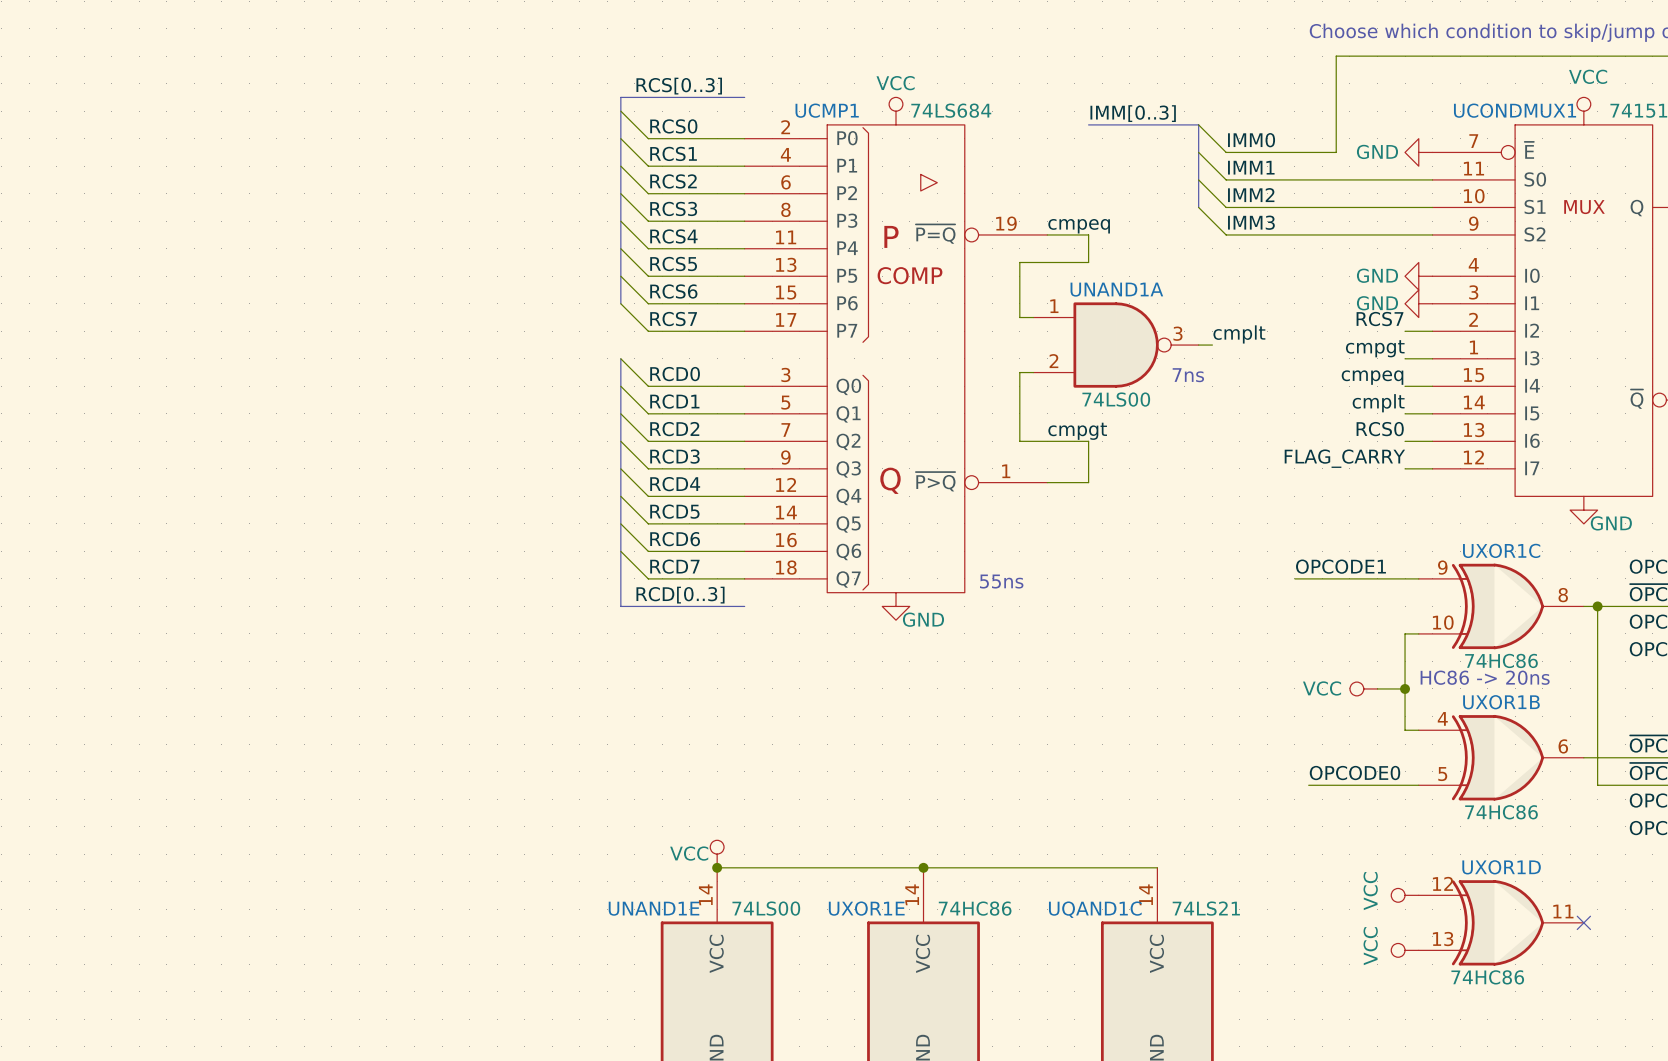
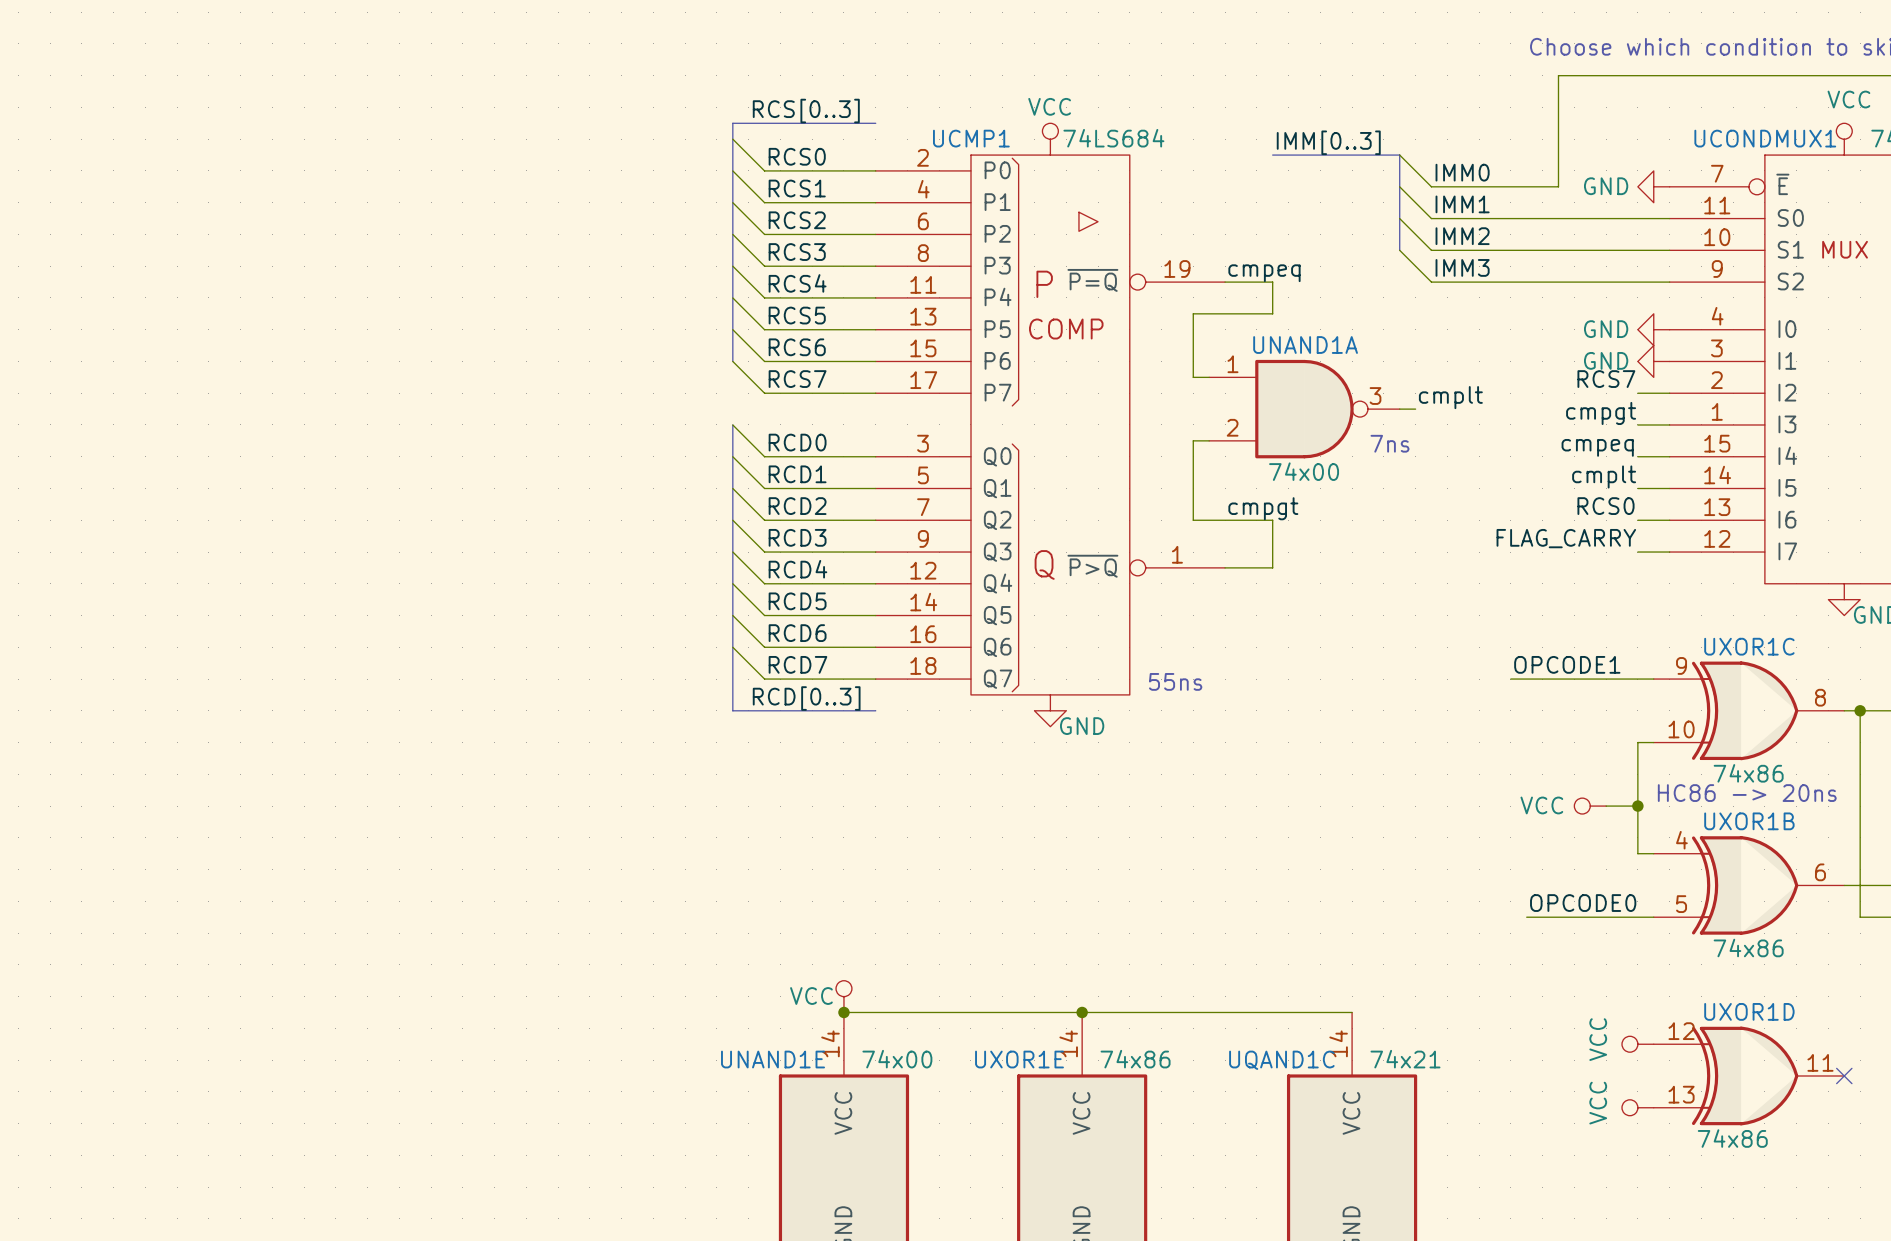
UNAND1A value: 74LS00 (1116, 399) -> 74x00 (1304, 471)
UXOR1C value: 74HC86 (1501, 660) -> 74x86 (1748, 773)
UXOR1B value: 74HC86 (1501, 812) -> 74x86 (1748, 948)
UNAND1E value: 74LS00 (766, 908) -> 74x00 (897, 1059)
UXOR1E value: 74HC86 (975, 908) -> 74x86 (1135, 1059)
UQAND1C value: 74LS21 (1206, 908) -> 74x21 (1405, 1059)
UXOR1D value: 74HC86 (1487, 977) -> 74x86 (1732, 1138)

